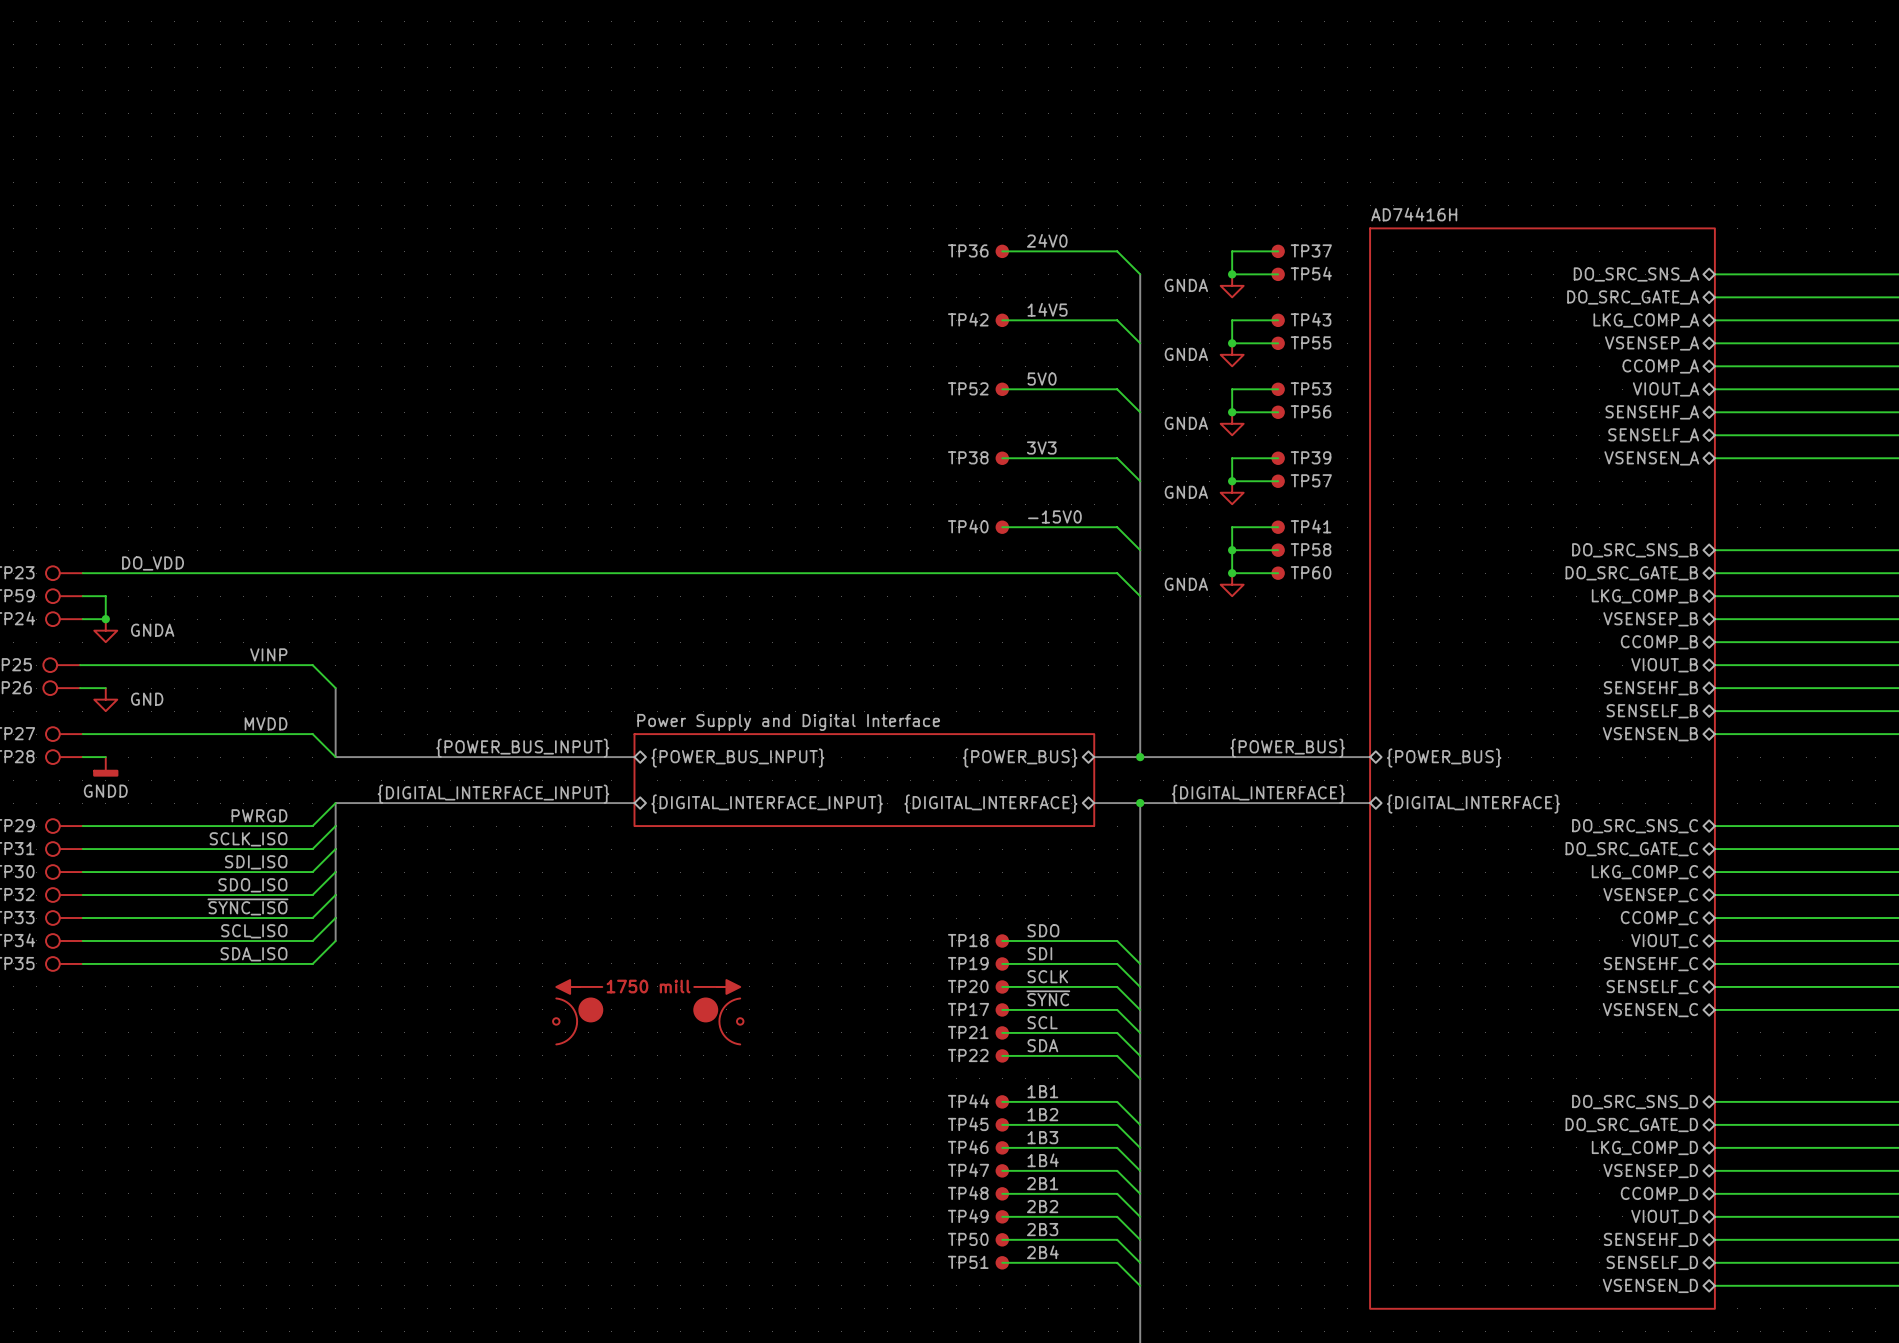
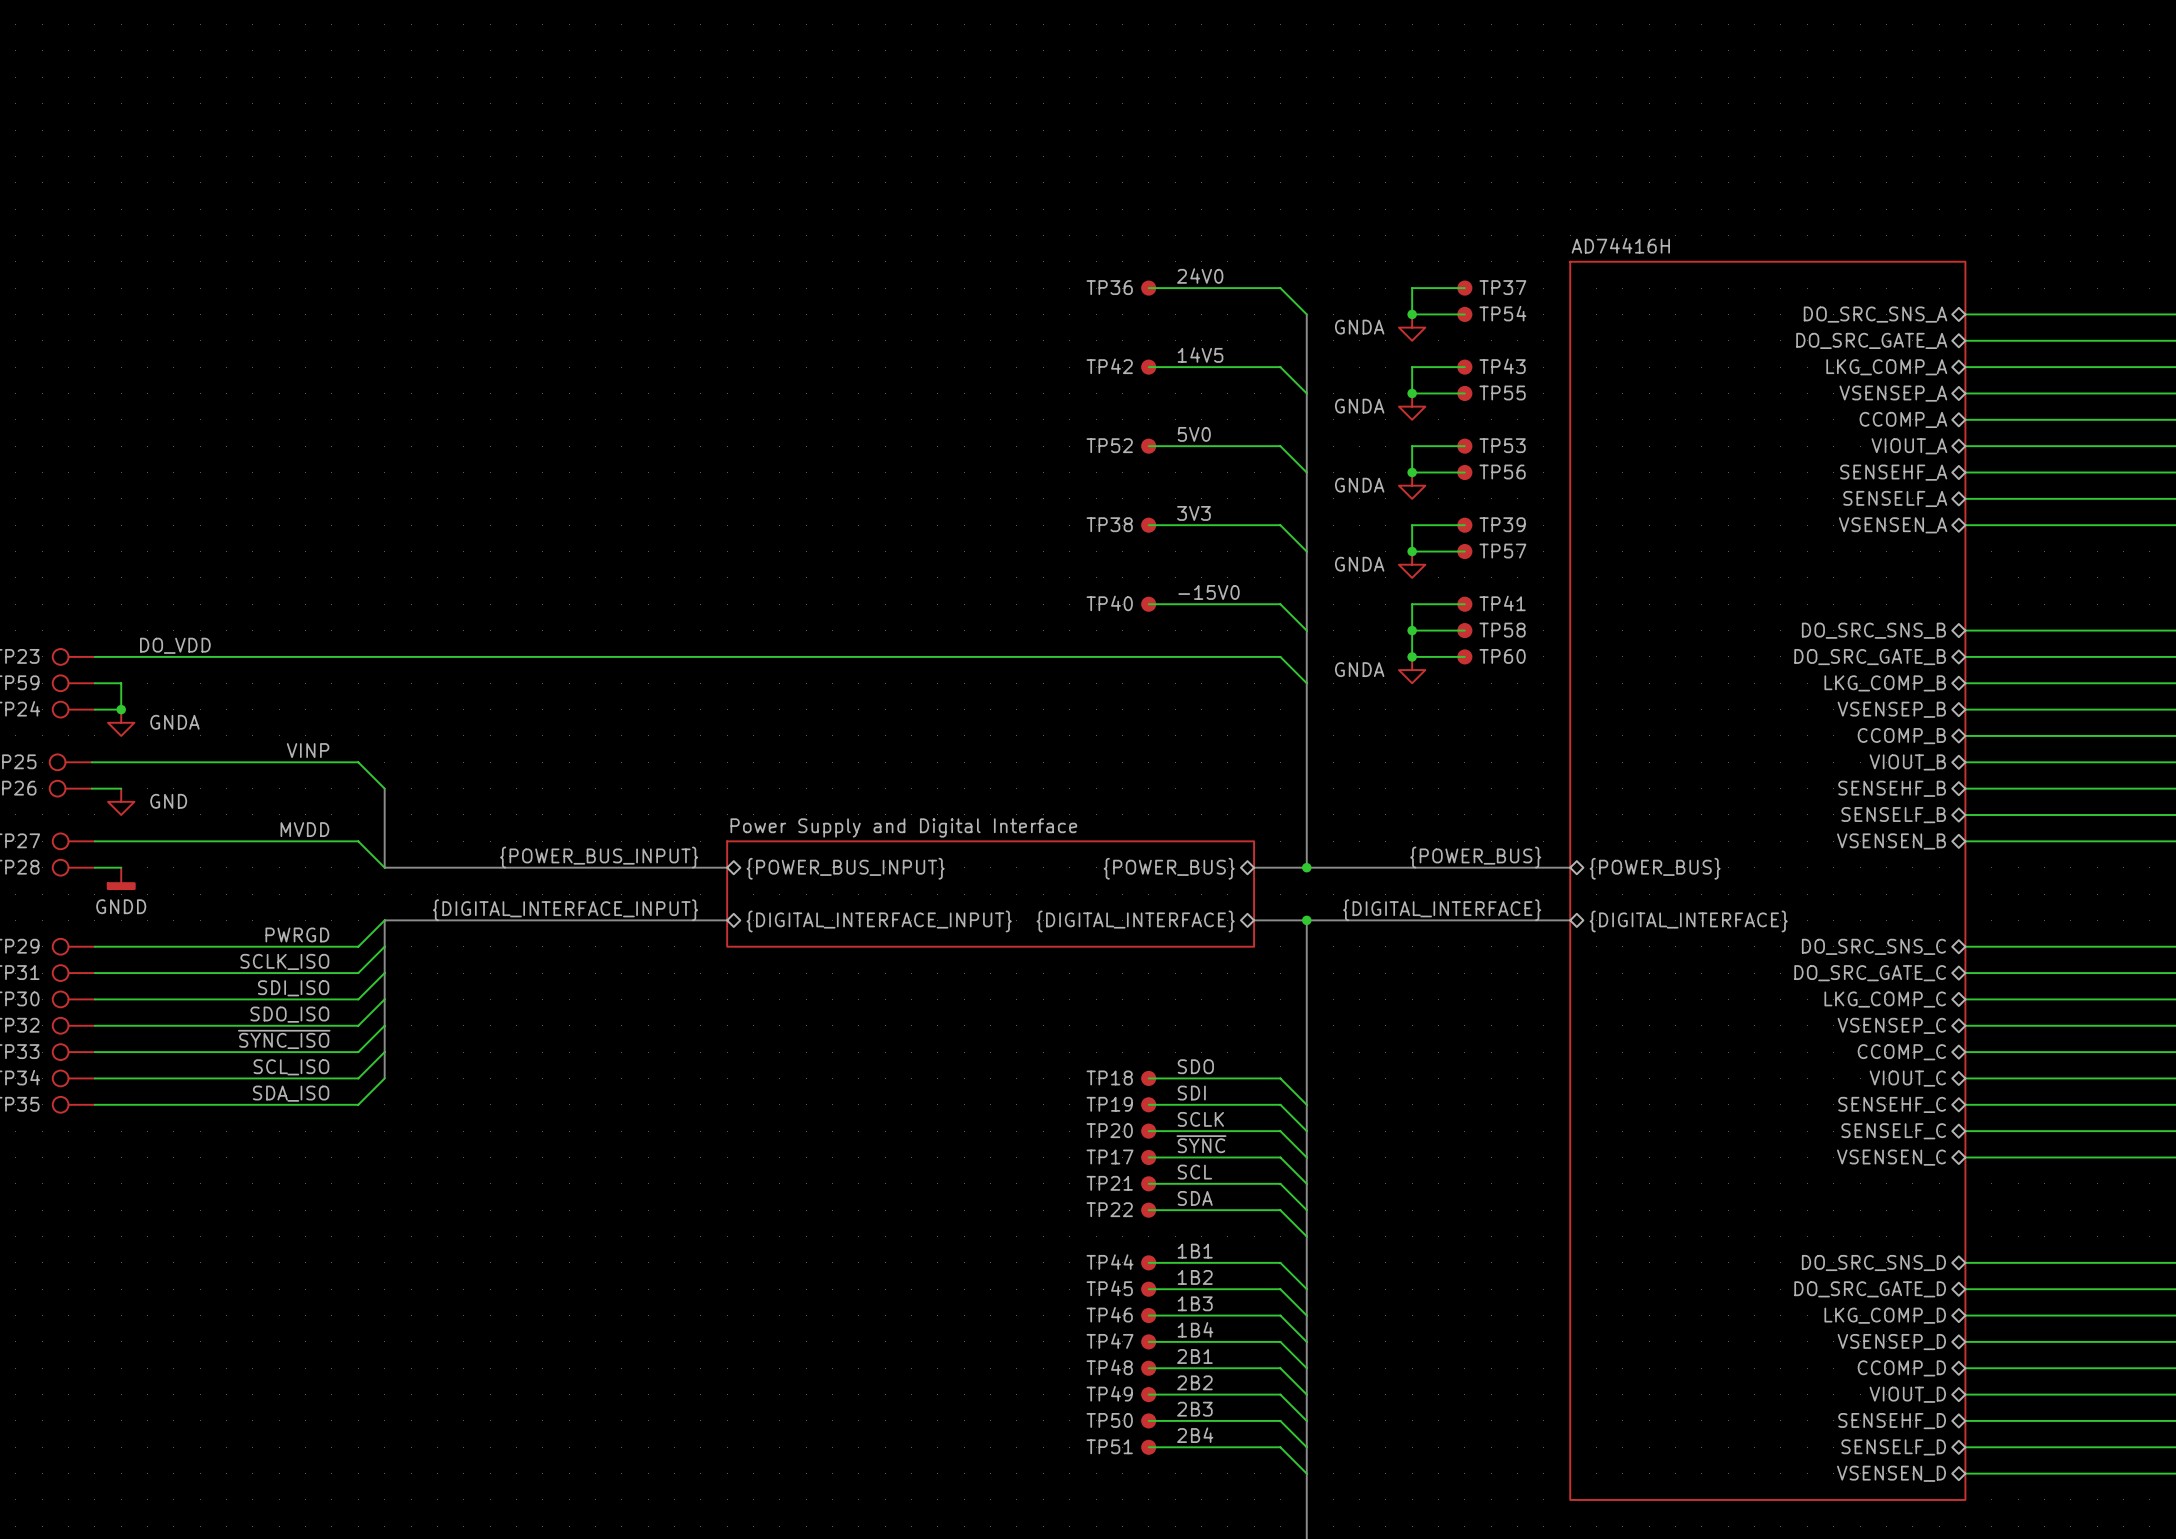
part: (648, 1012) -> none

